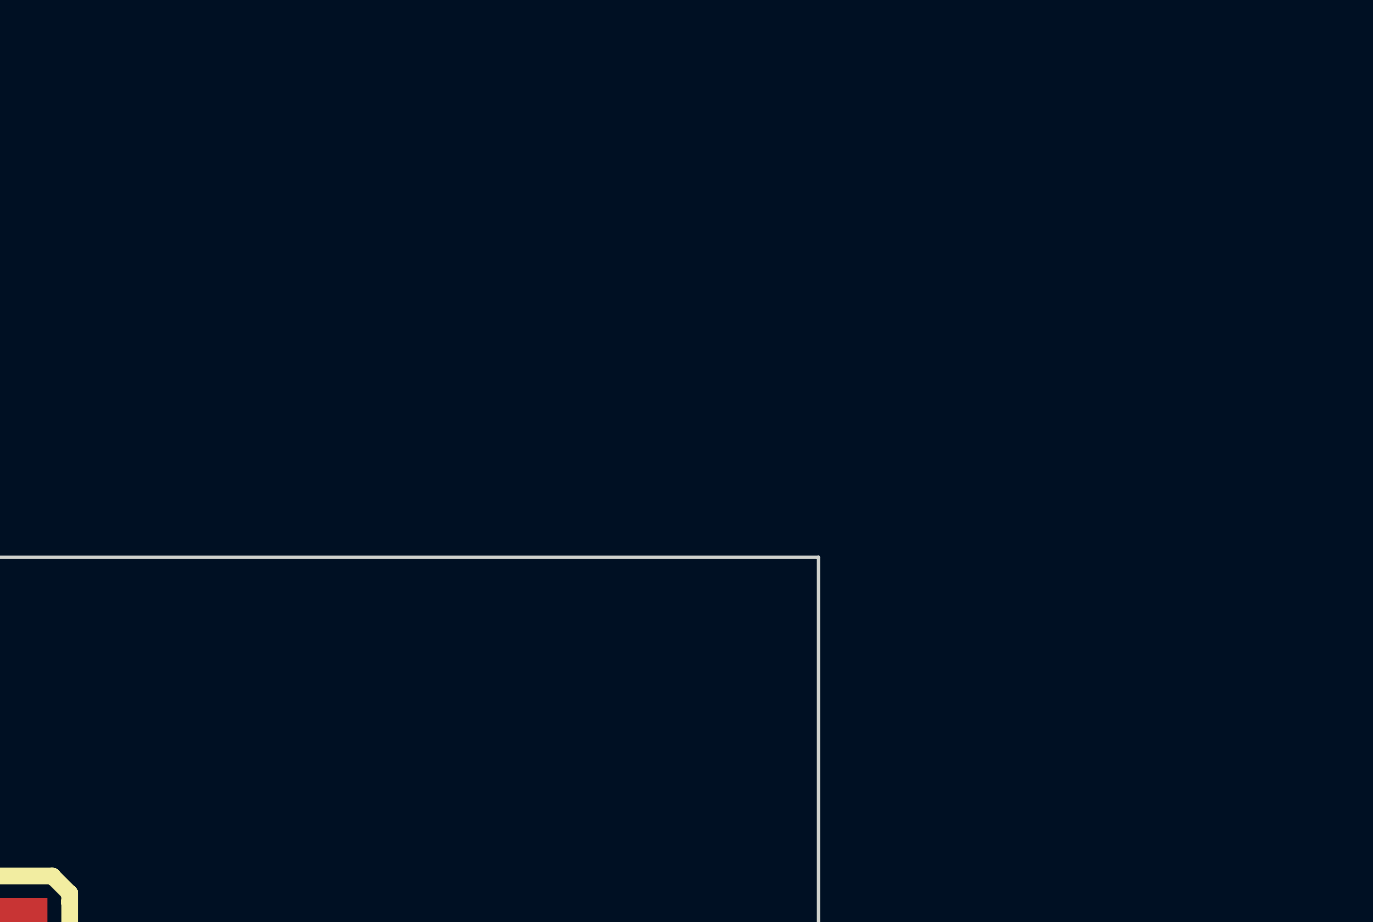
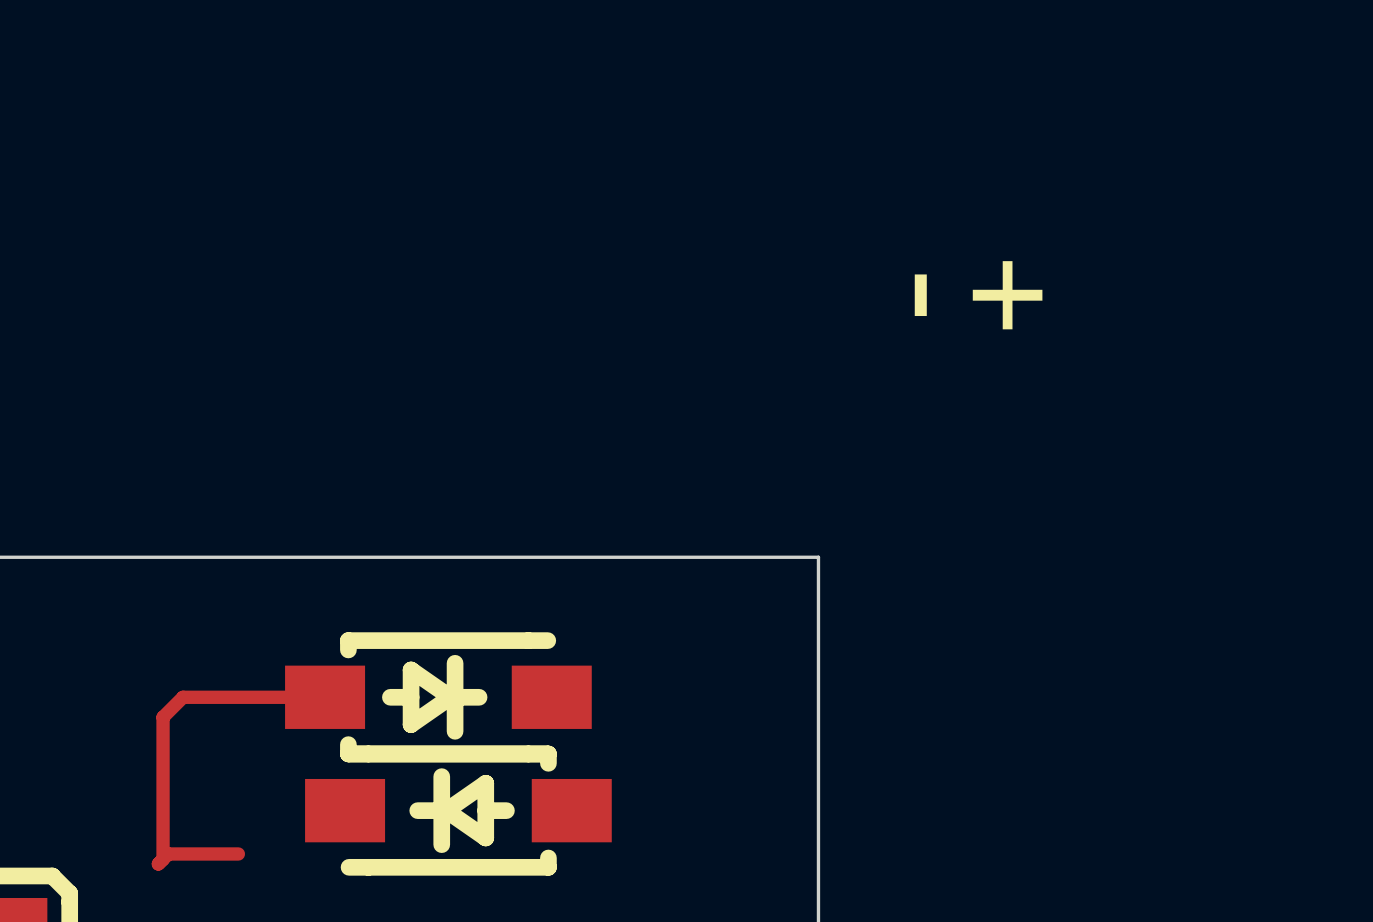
text: none -> - (920, 295)
text: none -> + (1007, 295)
track: none -> (325, 697) (183, 697) (163, 717) (163, 859)
part: none -> (438, 697)
part: none -> (458, 810)
track: none -> (238, 853) (168, 853) (158, 863)

